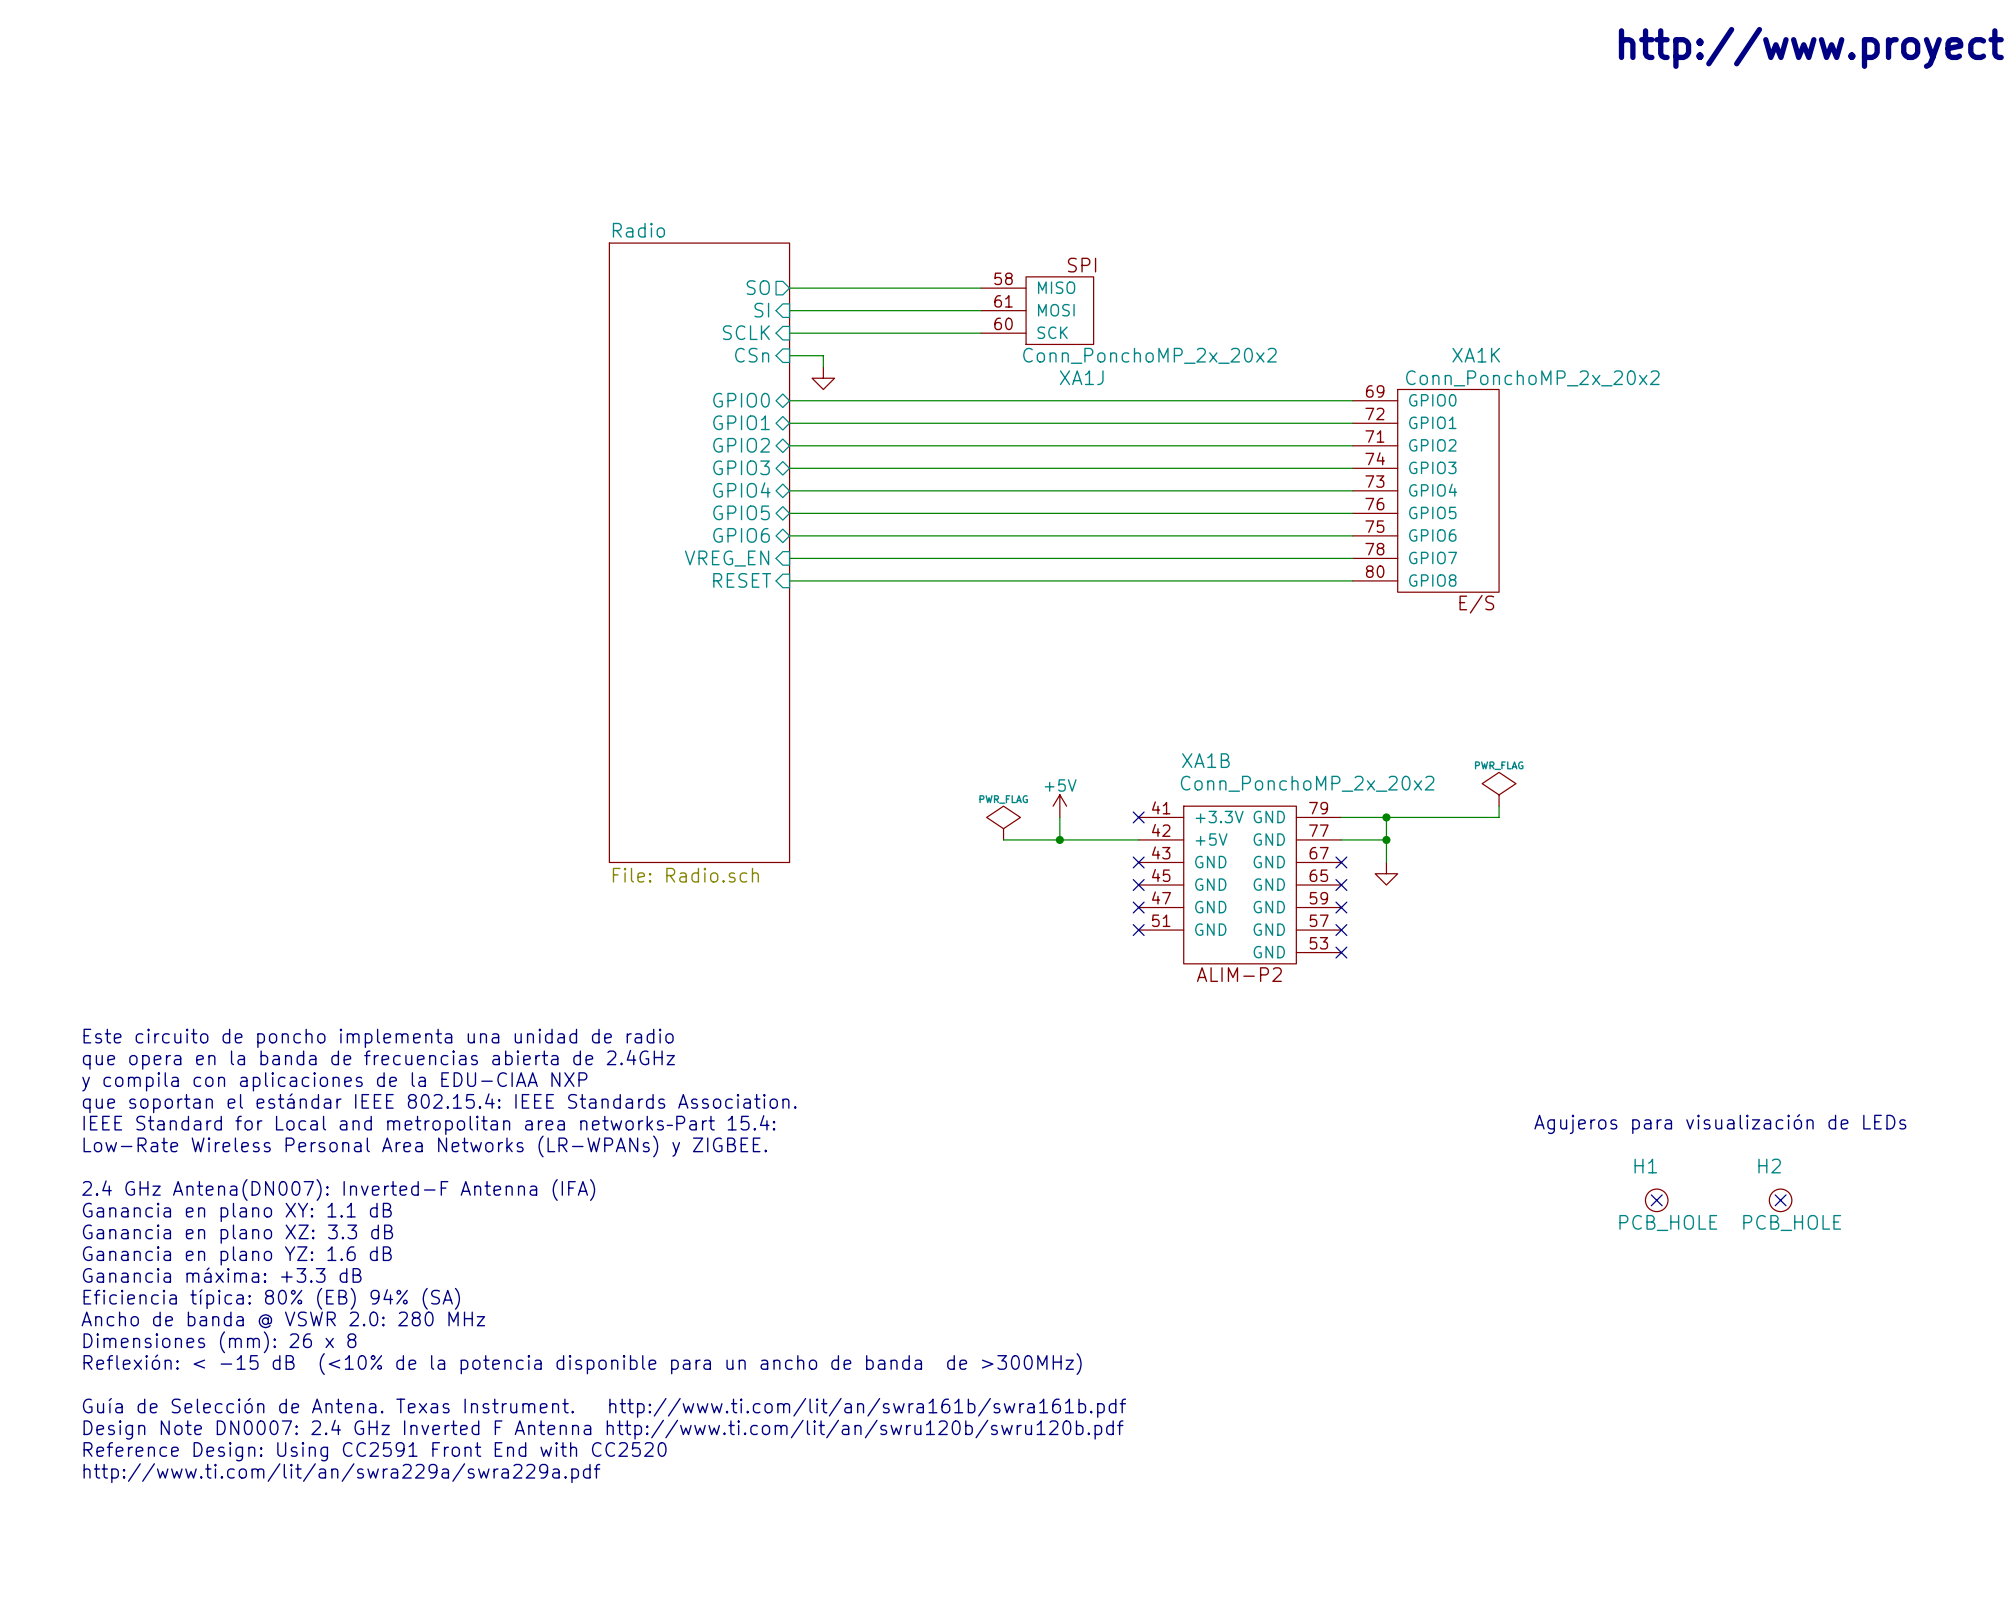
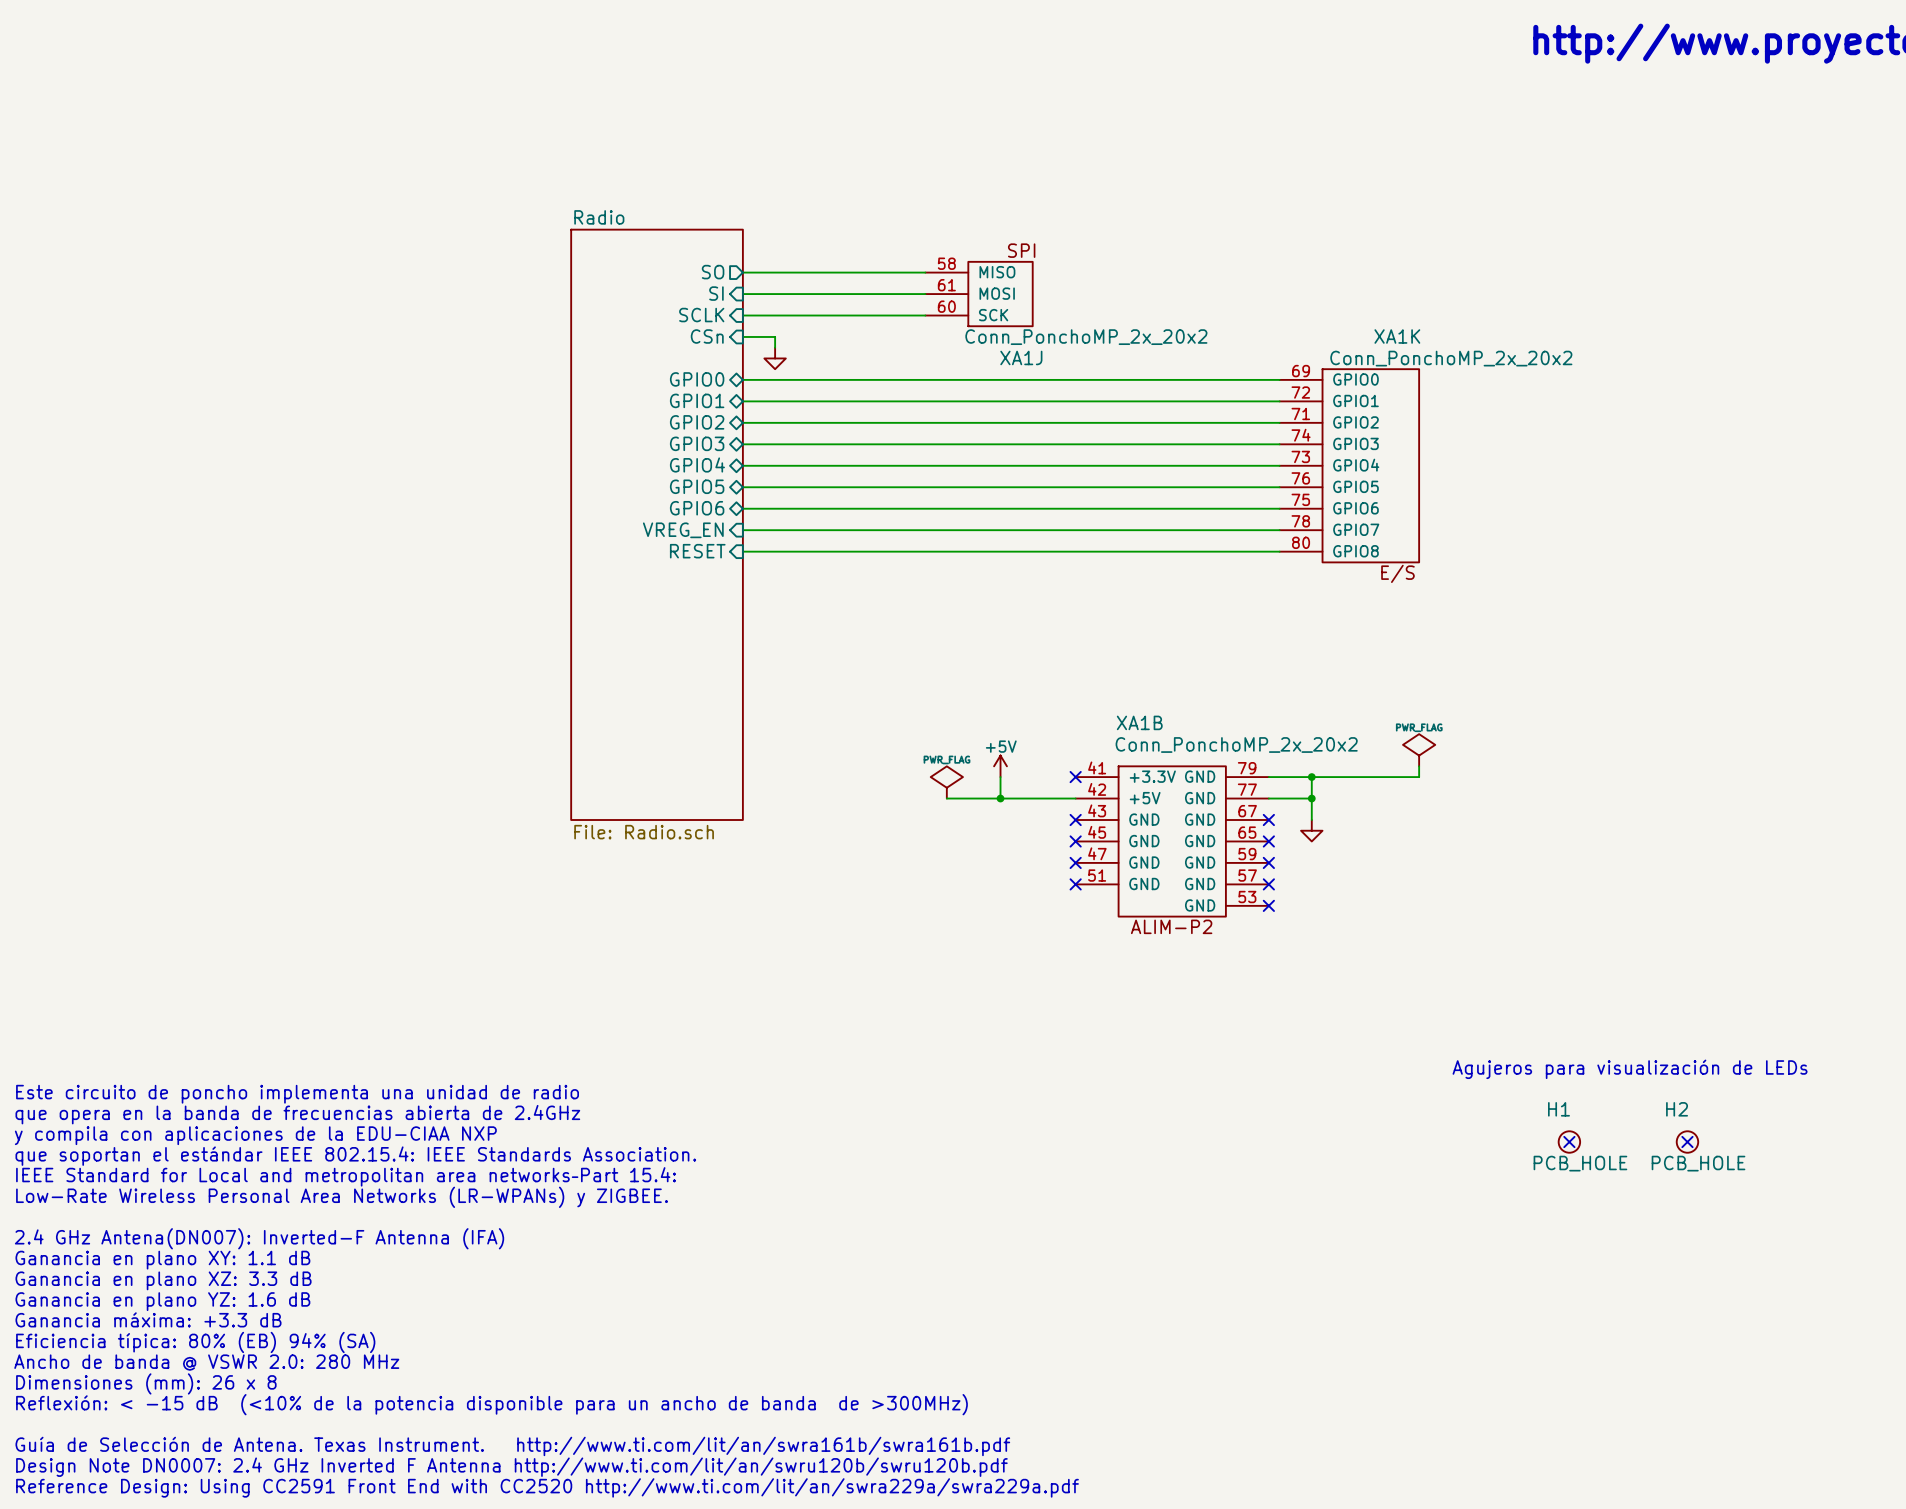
text position: Este circuito de poncho implementa una unidad de radio (378, 1038) -> Este circuito de poncho implementa una unidad de radio (297, 1094)
text position: que opera en la banda de frecuencias abierta de 2.4GHz (378, 1059) -> que opera en la banda de frecuencias abierta de 2.4GHz (297, 1114)
text position: y compila con aplicaciones de la EDU-CIAA NXP (334, 1081) -> y compila con aplicaciones de la EDU-CIAA NXP (255, 1135)
text position: que soportan el estándar IEEE 802.15.4: IEEE Standards Association. (439, 1103) -> que soportan el estándar IEEE 802.15.4: IEEE Standards Association. (355, 1156)
text position: IEEE Standard for Local and metropolitan area networks–Part 15.4: (429, 1125) -> IEEE Standard for Local and metropolitan area networks–Part 15.4: (345, 1176)
text position: Low-Rate Wireless Personal Area Networks (LR-WPANs) y ZIGBEE. (425, 1146) -> Low-Rate Wireless Personal Area Networks (LR-WPANs) y ZIGBEE. (342, 1197)
text position: 2.4 GHz Antena(DN007): Inverted-F Antenna (IFA) (338, 1190) -> 2.4 GHz Antena(DN007): Inverted-F Antenna (IFA) (259, 1238)
text position: Ganancia en plano XY: 1.1 dB (237, 1212) -> Ganancia en plano XY: 1.1 dB (162, 1260)
text position: Ganancia en plano XZ: 3.3 dB (237, 1234) -> Ganancia en plano XZ: 3.3 dB (163, 1280)
text position: Ganancia en plano YZ: 1.6 dB (237, 1255) -> Ganancia en plano YZ: 1.6 dB (162, 1301)
text position: Ganancia máxima: +3.3 dB (222, 1275) -> Ganancia máxima: +3.3 dB (148, 1319)
text position: Eficiencia típica: 80% (EB) 94% (SA) (271, 1298) -> Eficiencia típica: 80% (EB) 94% (SA) (195, 1342)
text position: Ancho de banda @ VSWR 2.0: 280 MHz (283, 1319) -> Ancho de banda @ VSWR 2.0: 280 MHz (206, 1362)
text position: Dimensiones (mm): 26 x 8 (219, 1342) -> Dimensiones (mm): 26 x 8 (146, 1383)
text position: Reflexión: < -15 dB (<10% de la potencia disponible para un ancho de banda de >300MHz) (582, 1364) -> Reflexión: < -15 dB (<10% de la potencia disponible para un ancho de banda de >300MHz) (491, 1404)
text position: Guía de Selección de Antena. Texas Instrument. http://www.ti.com/lit/an/swra161b/swra161b.pdf (604, 1407) -> Guía de Selección de Antena. Texas Instrument. http://www.ti.com/lit/an/swra161b/swra161b.pdf (512, 1446)
text position: Design Note DN0007: 2.4 GHz Inverted F Antenna http://www.ti.com/lit/an/swru120b/swru120b.pdf (603, 1429) -> Design Note DN0007: 2.4 GHz Inverted F Antenna http://www.ti.com/lit/an/swru120b/swru120b.pdf (511, 1467)
text: Reference Design: Using CC2591 Front End with CC2520 (375, 1451) -> none
text: http://www.ti.com/lit/an/swra229a/swra229a.pdf (341, 1473) -> none
text: none -> Reference Design: Using CC2591 Front End with CC2520 http://www.ti.com/lit/an/swra229a/swra229a.pdf (547, 1487)

